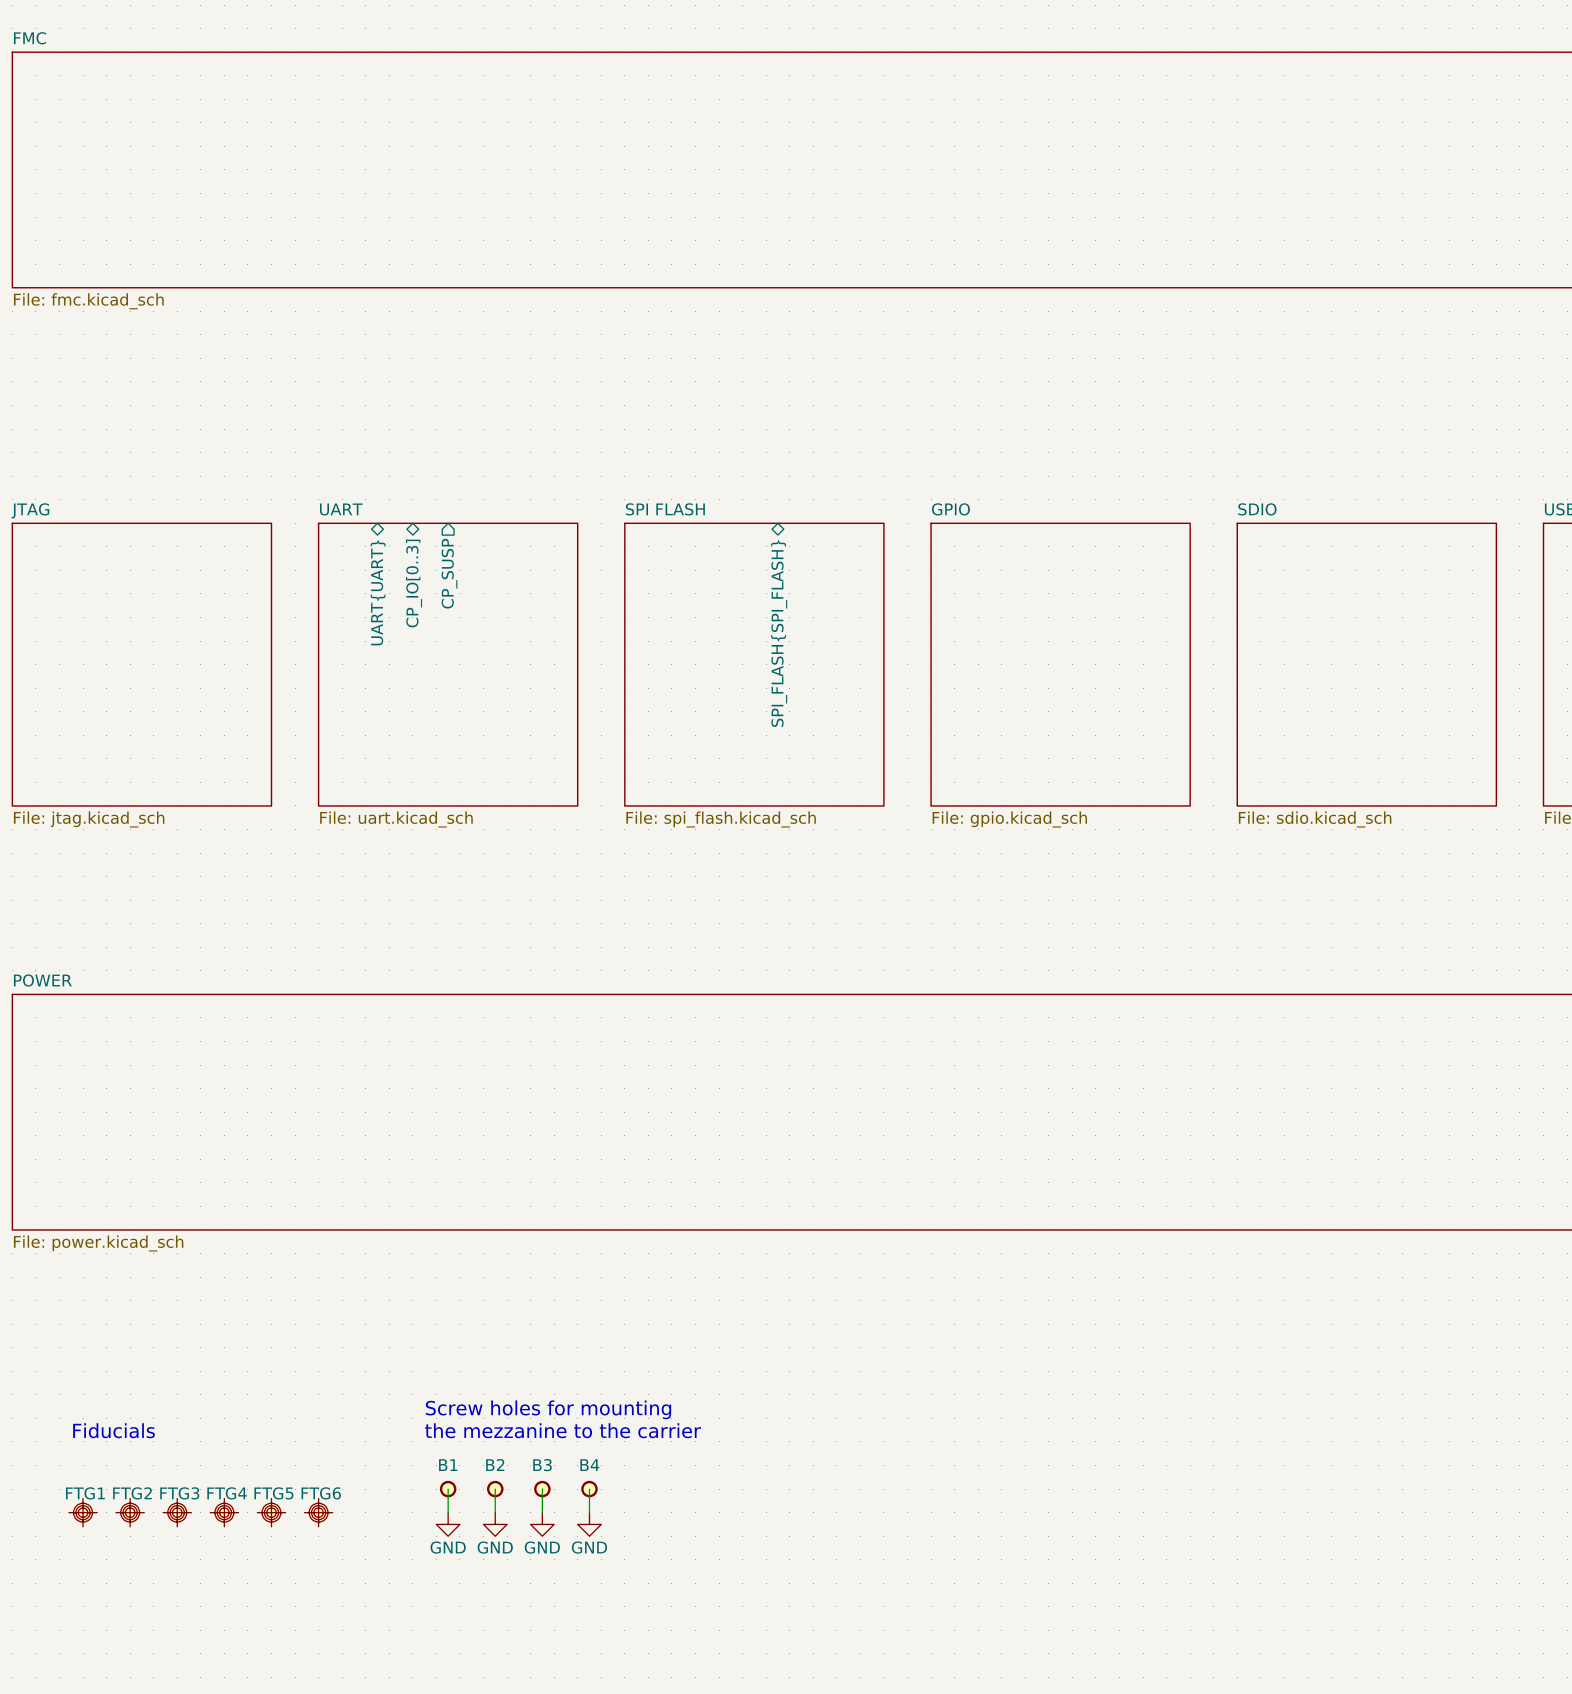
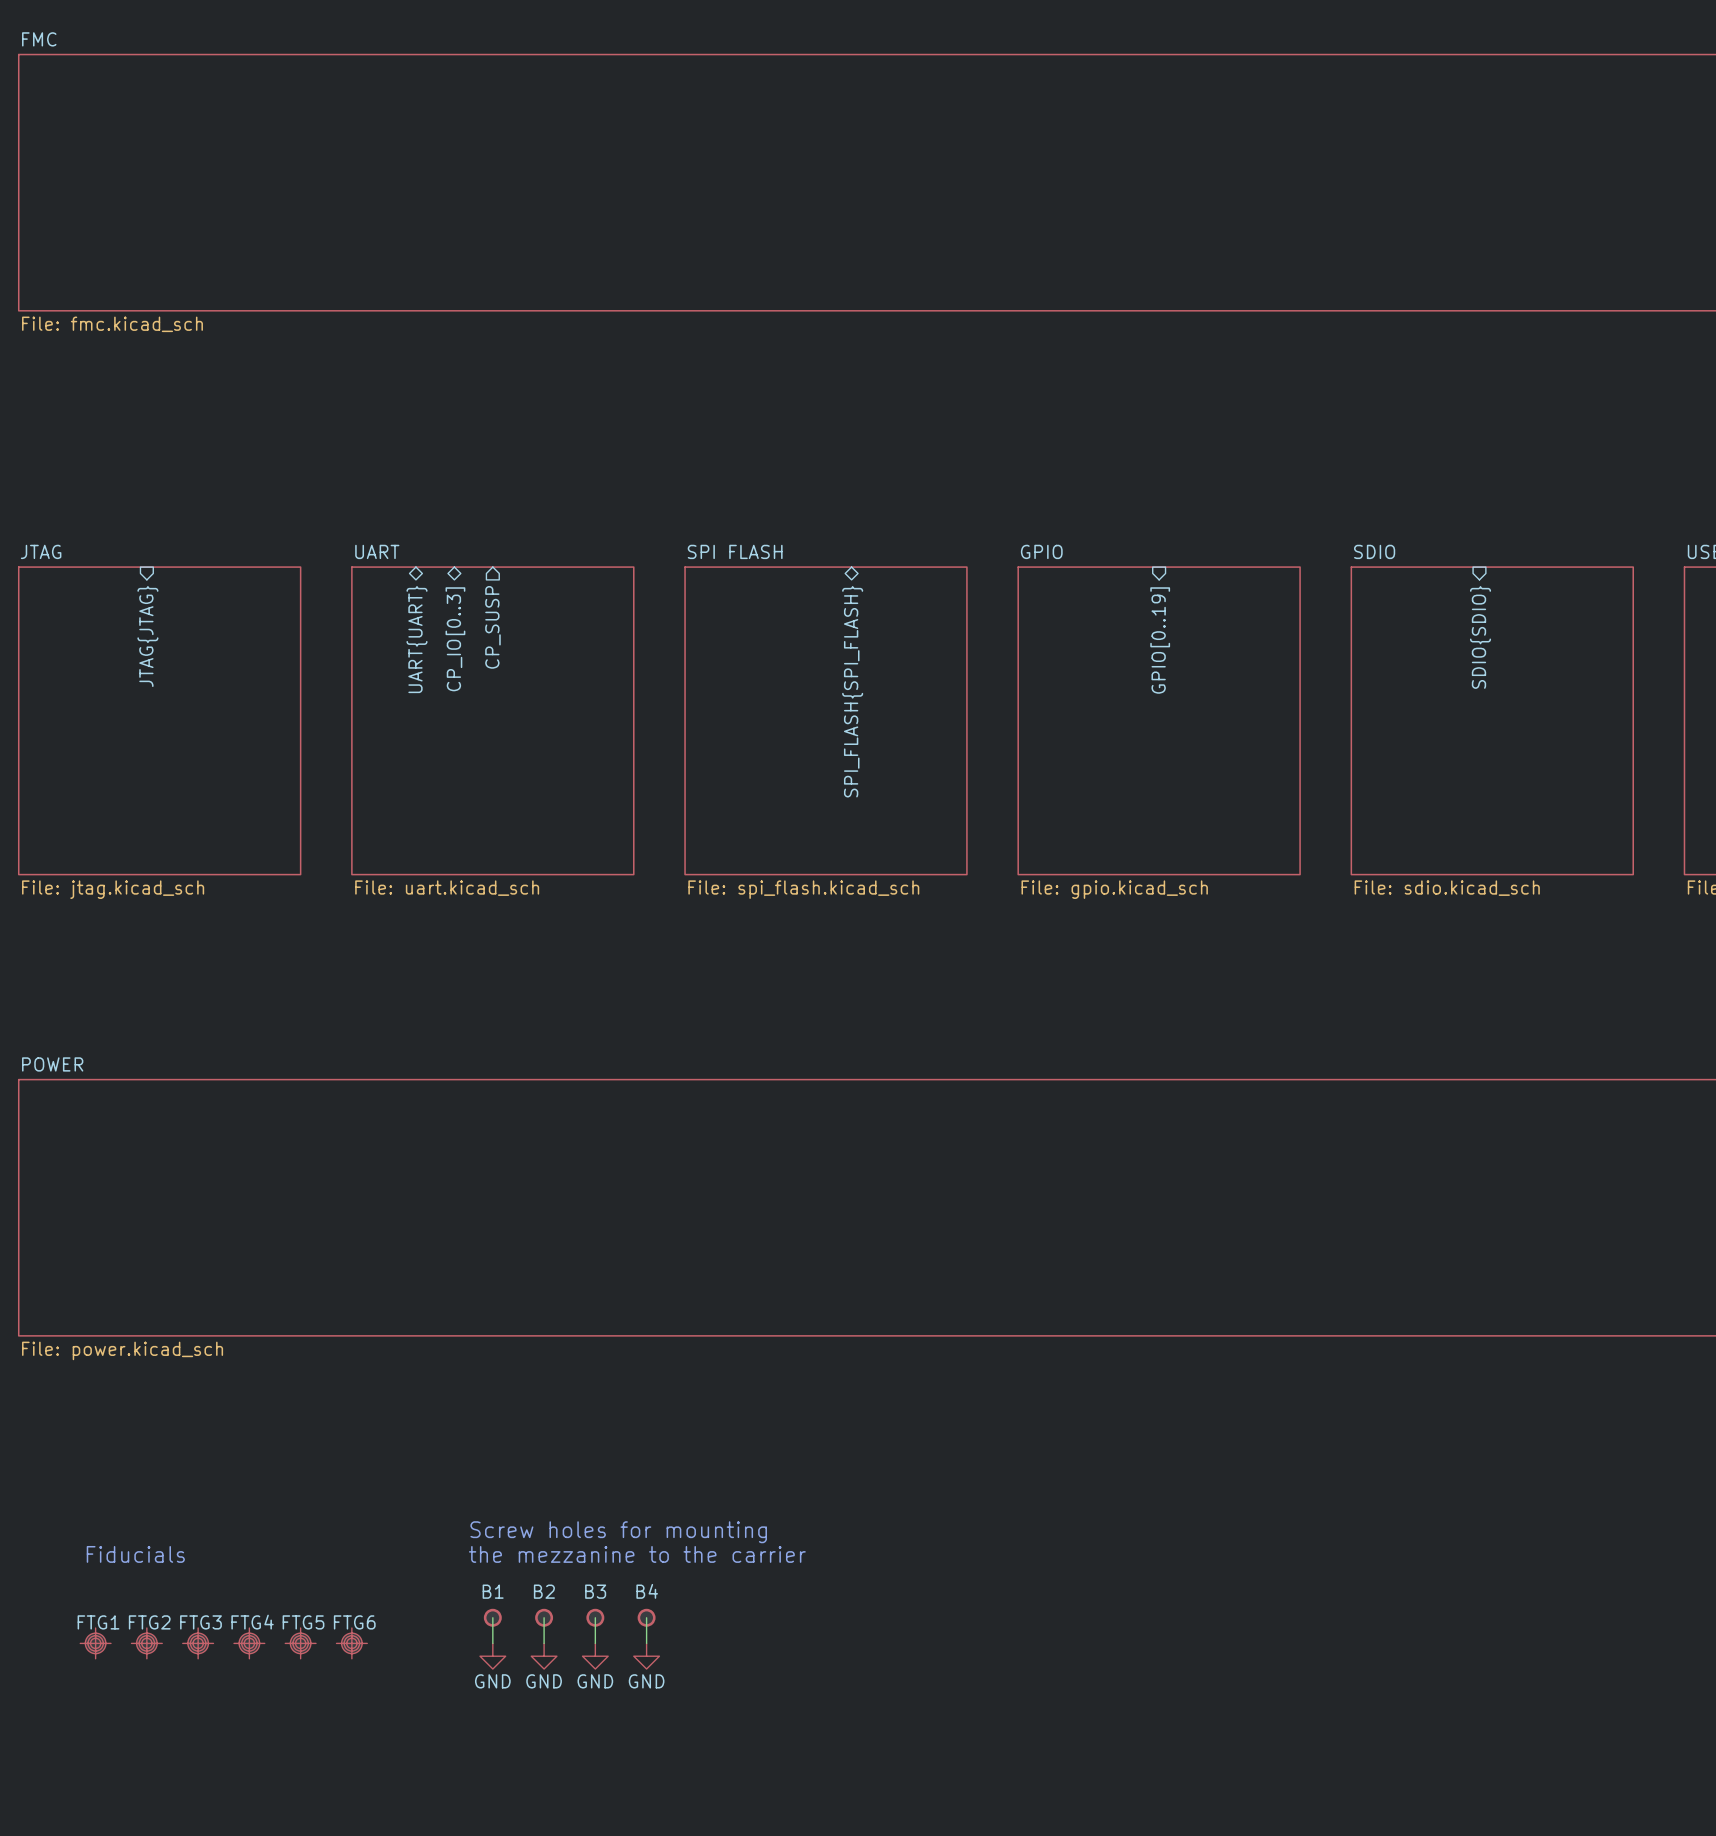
sheet pin: none -> GPIO[0..19] (1160, 640)
sheet pin: none -> JTAG{JTAG} (147, 636)
sheet pin: none -> SDIO{SDIO} (1480, 637)

